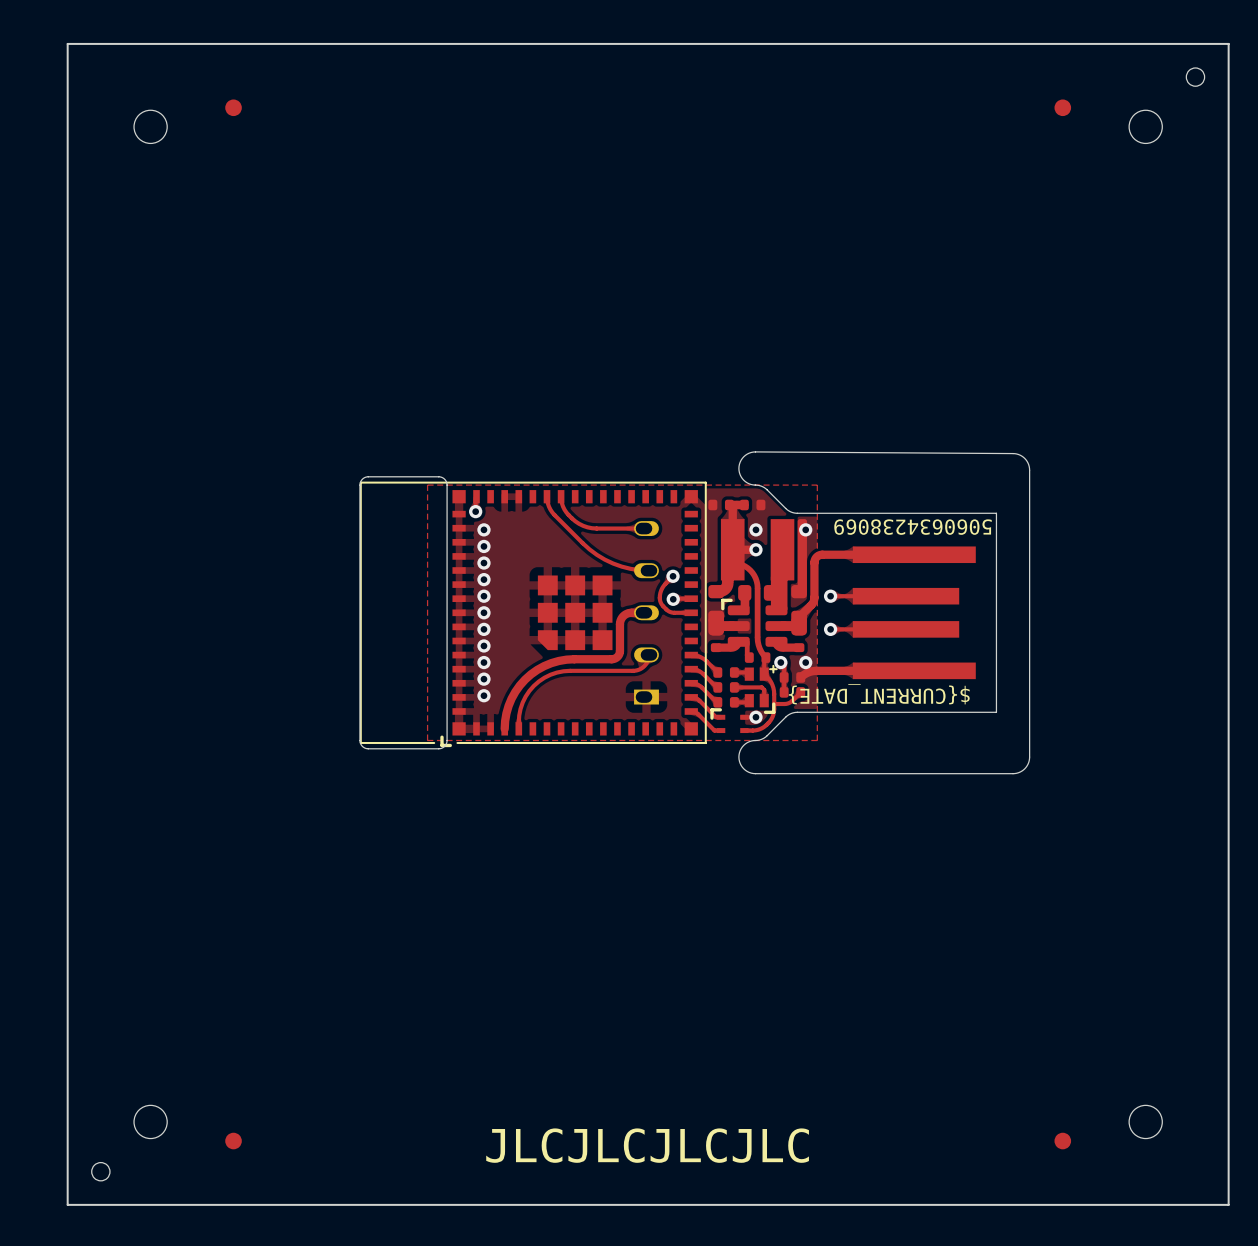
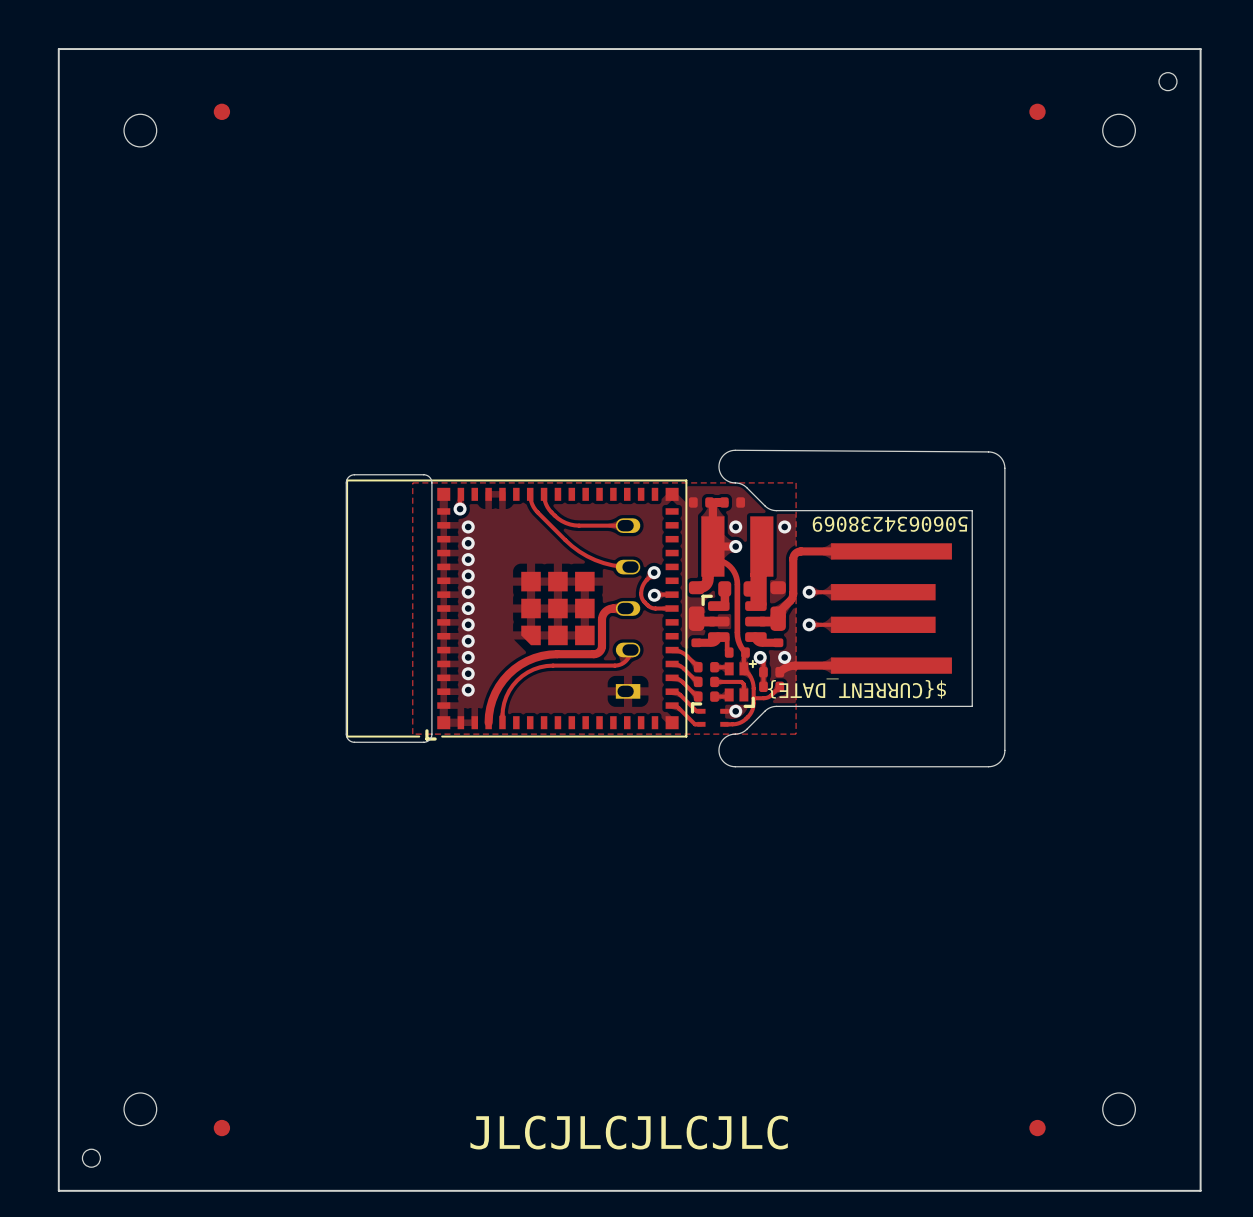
part footprint: [708, 519, 807, 663] -> [688, 516, 786, 658]

